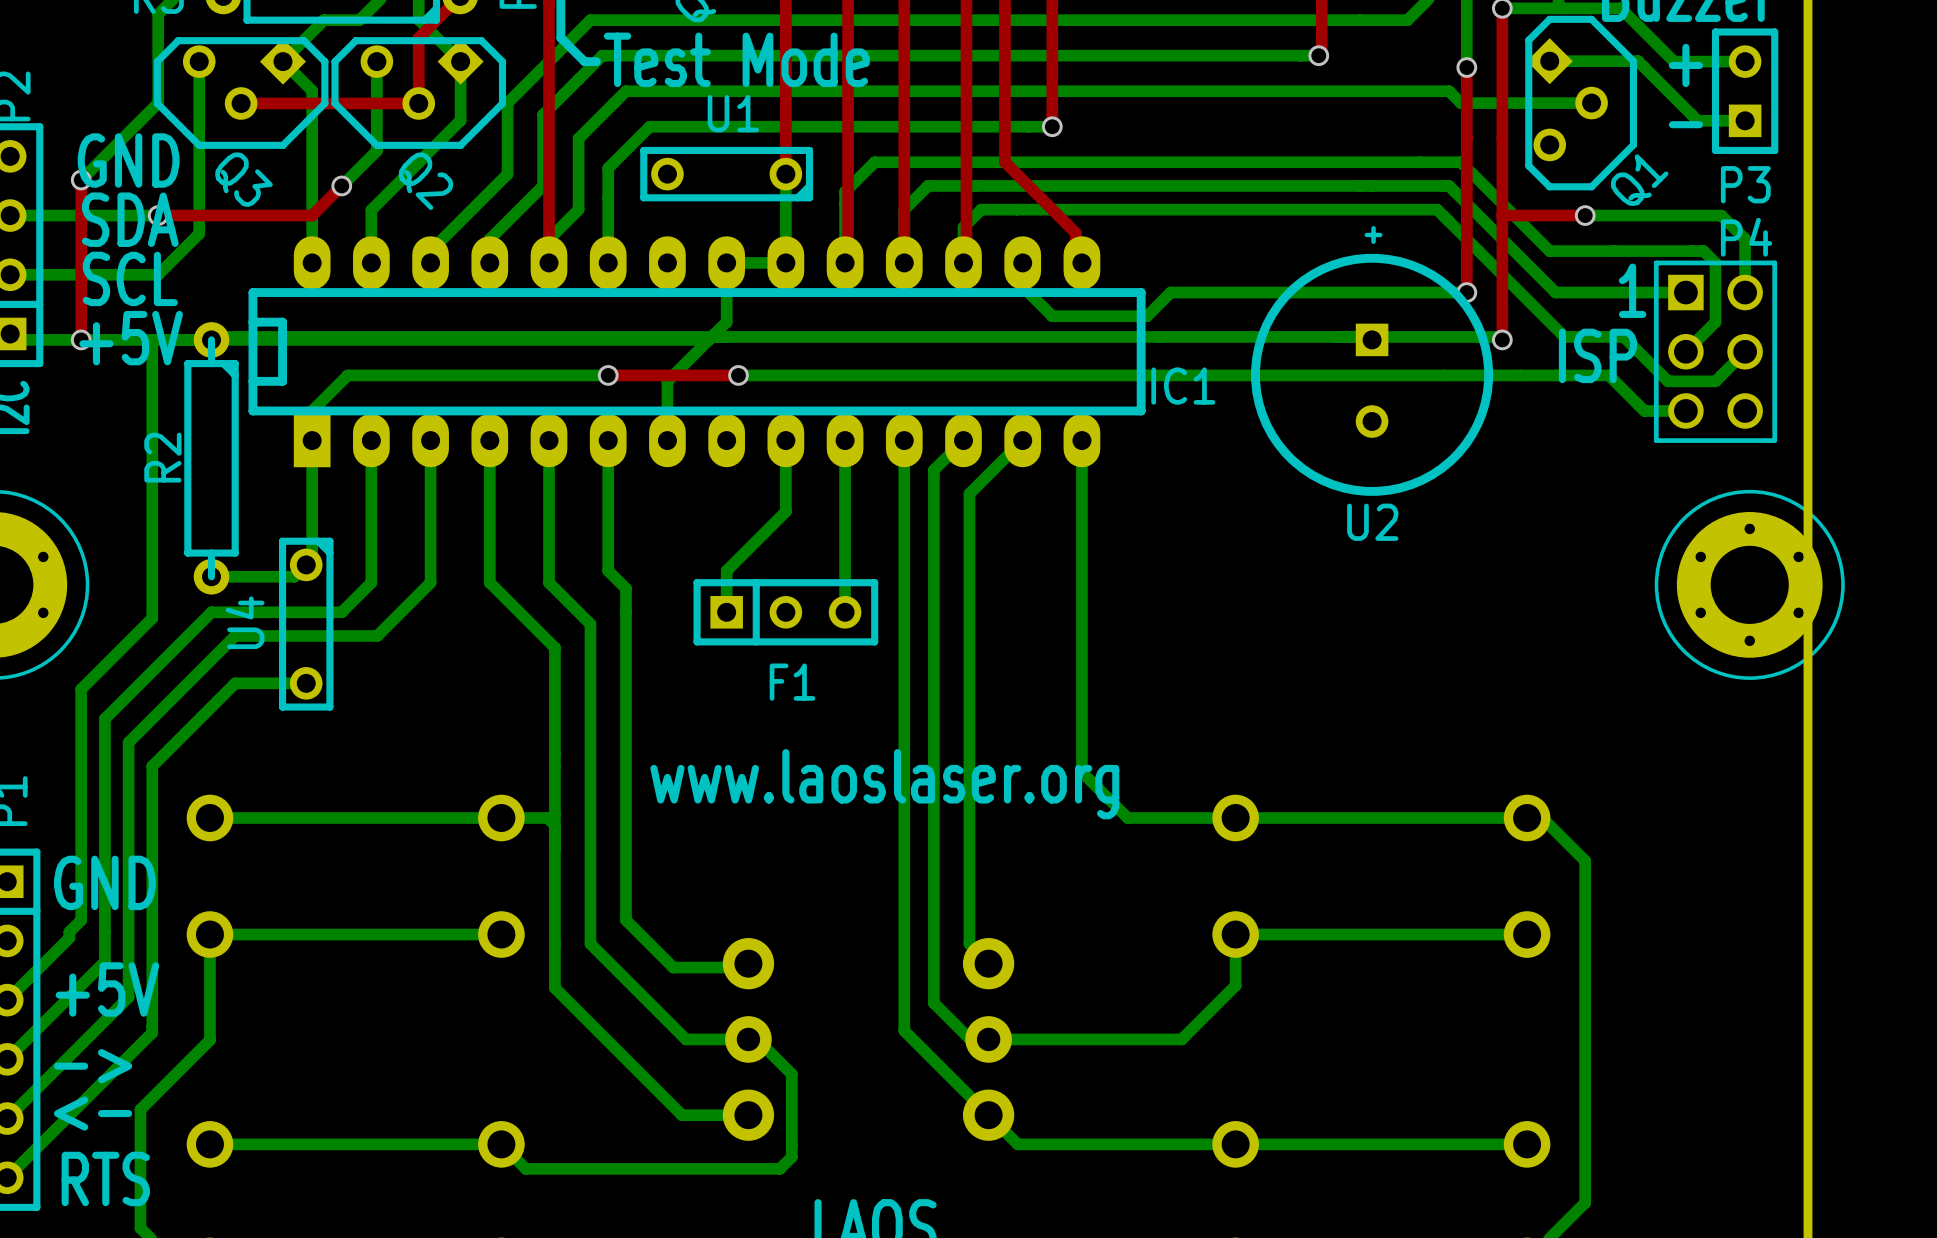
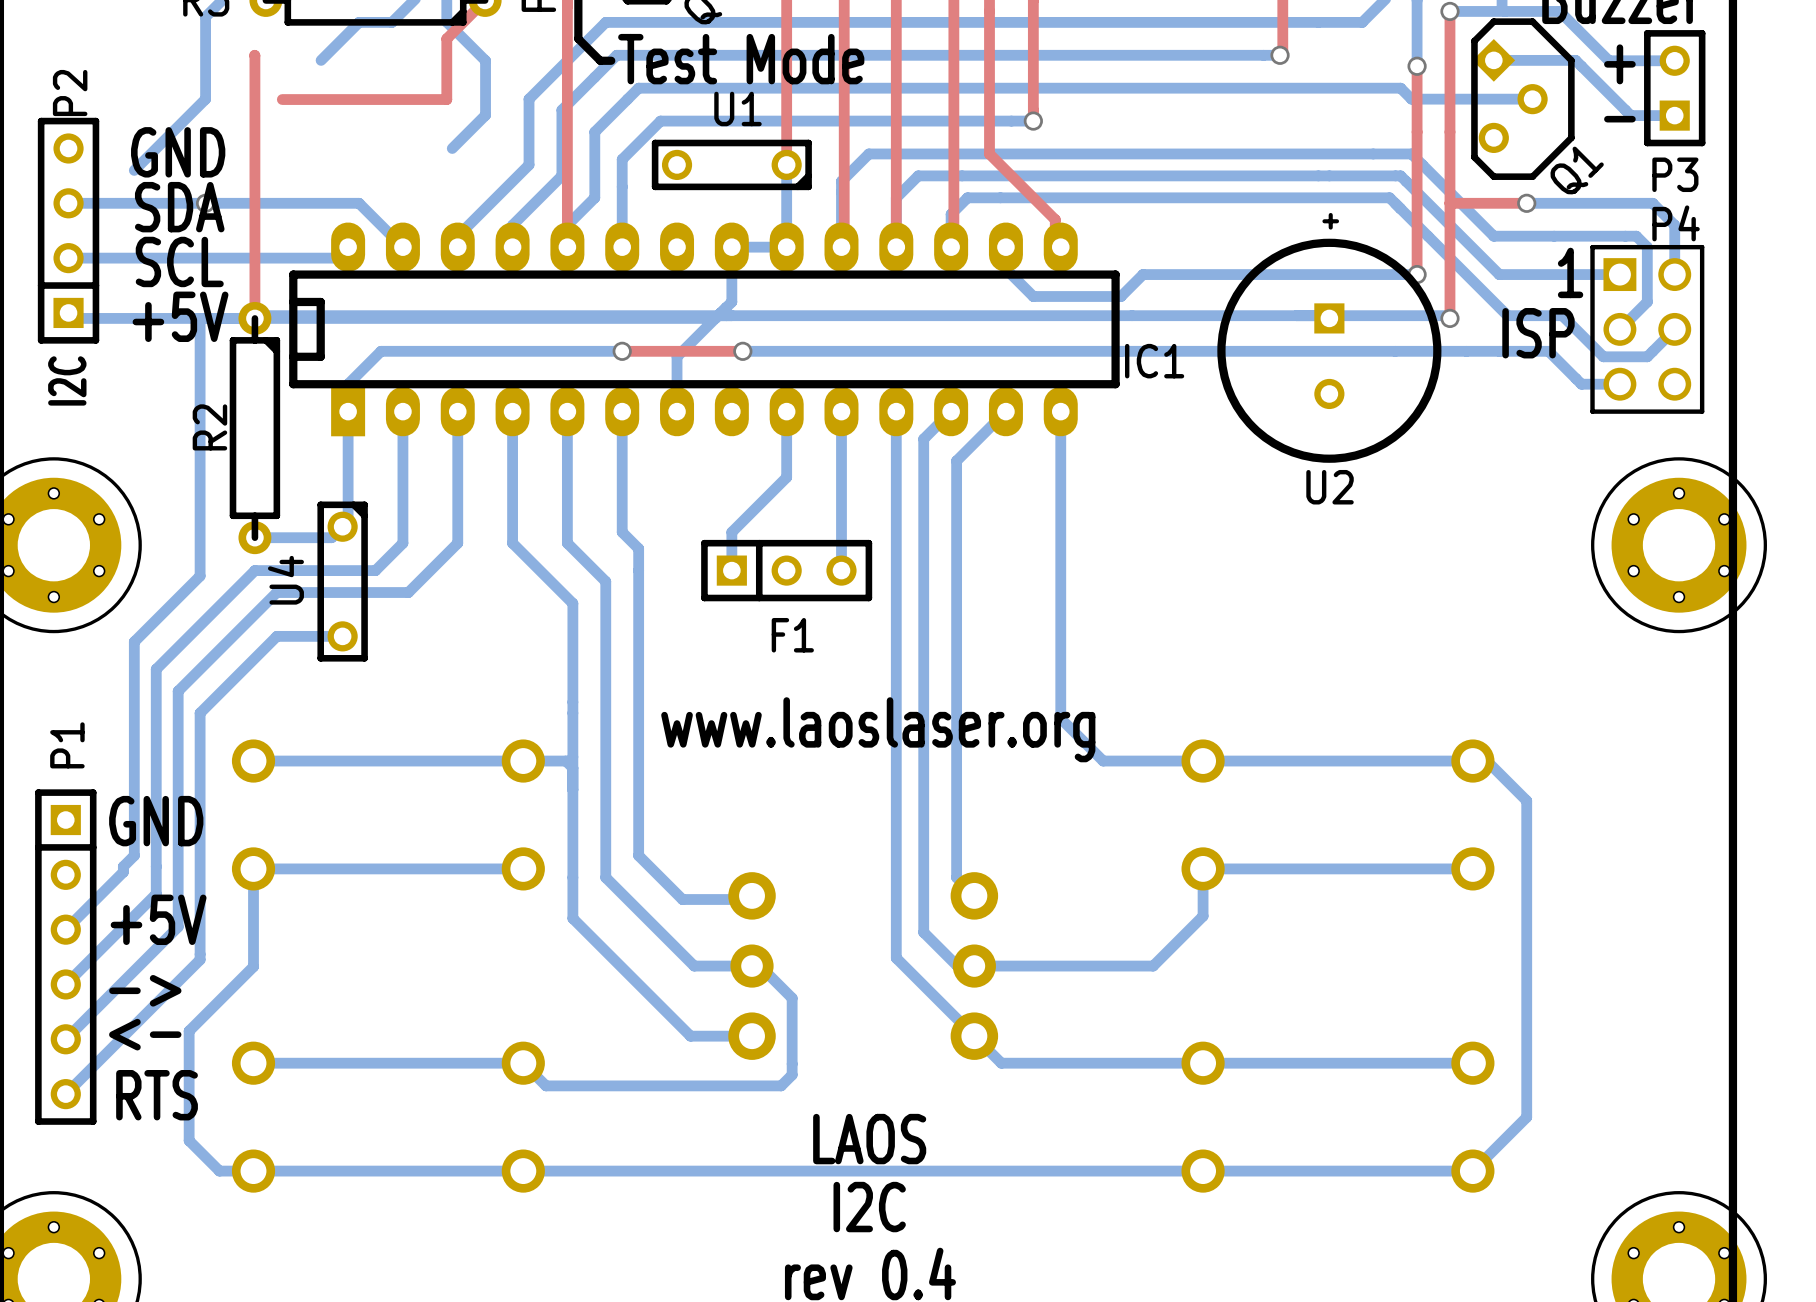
top track: none -> (254, 55) (254, 318)
bottom track: (199, 61) (199, 233) (158, 274) -> (348, 247) (337, 258) (205, 258)
bottom track: (282, 61) (312, 90) (312, 262) -> none
bottom track: (376, 61) (376, 150) (341, 185) -> none
Q3: (241, 93) -> none
Q2: (418, 93) -> none
bottom track: (424, 156) (371, 210) (371, 262) -> (205, 203) (359, 203) (402, 247)
top track: (81, 180) (81, 339) -> none
via: (81, 180) -> none
top track: (341, 185) (312, 215) (158, 215) -> none
via: (341, 185) -> none
via: (81, 339) -> none

